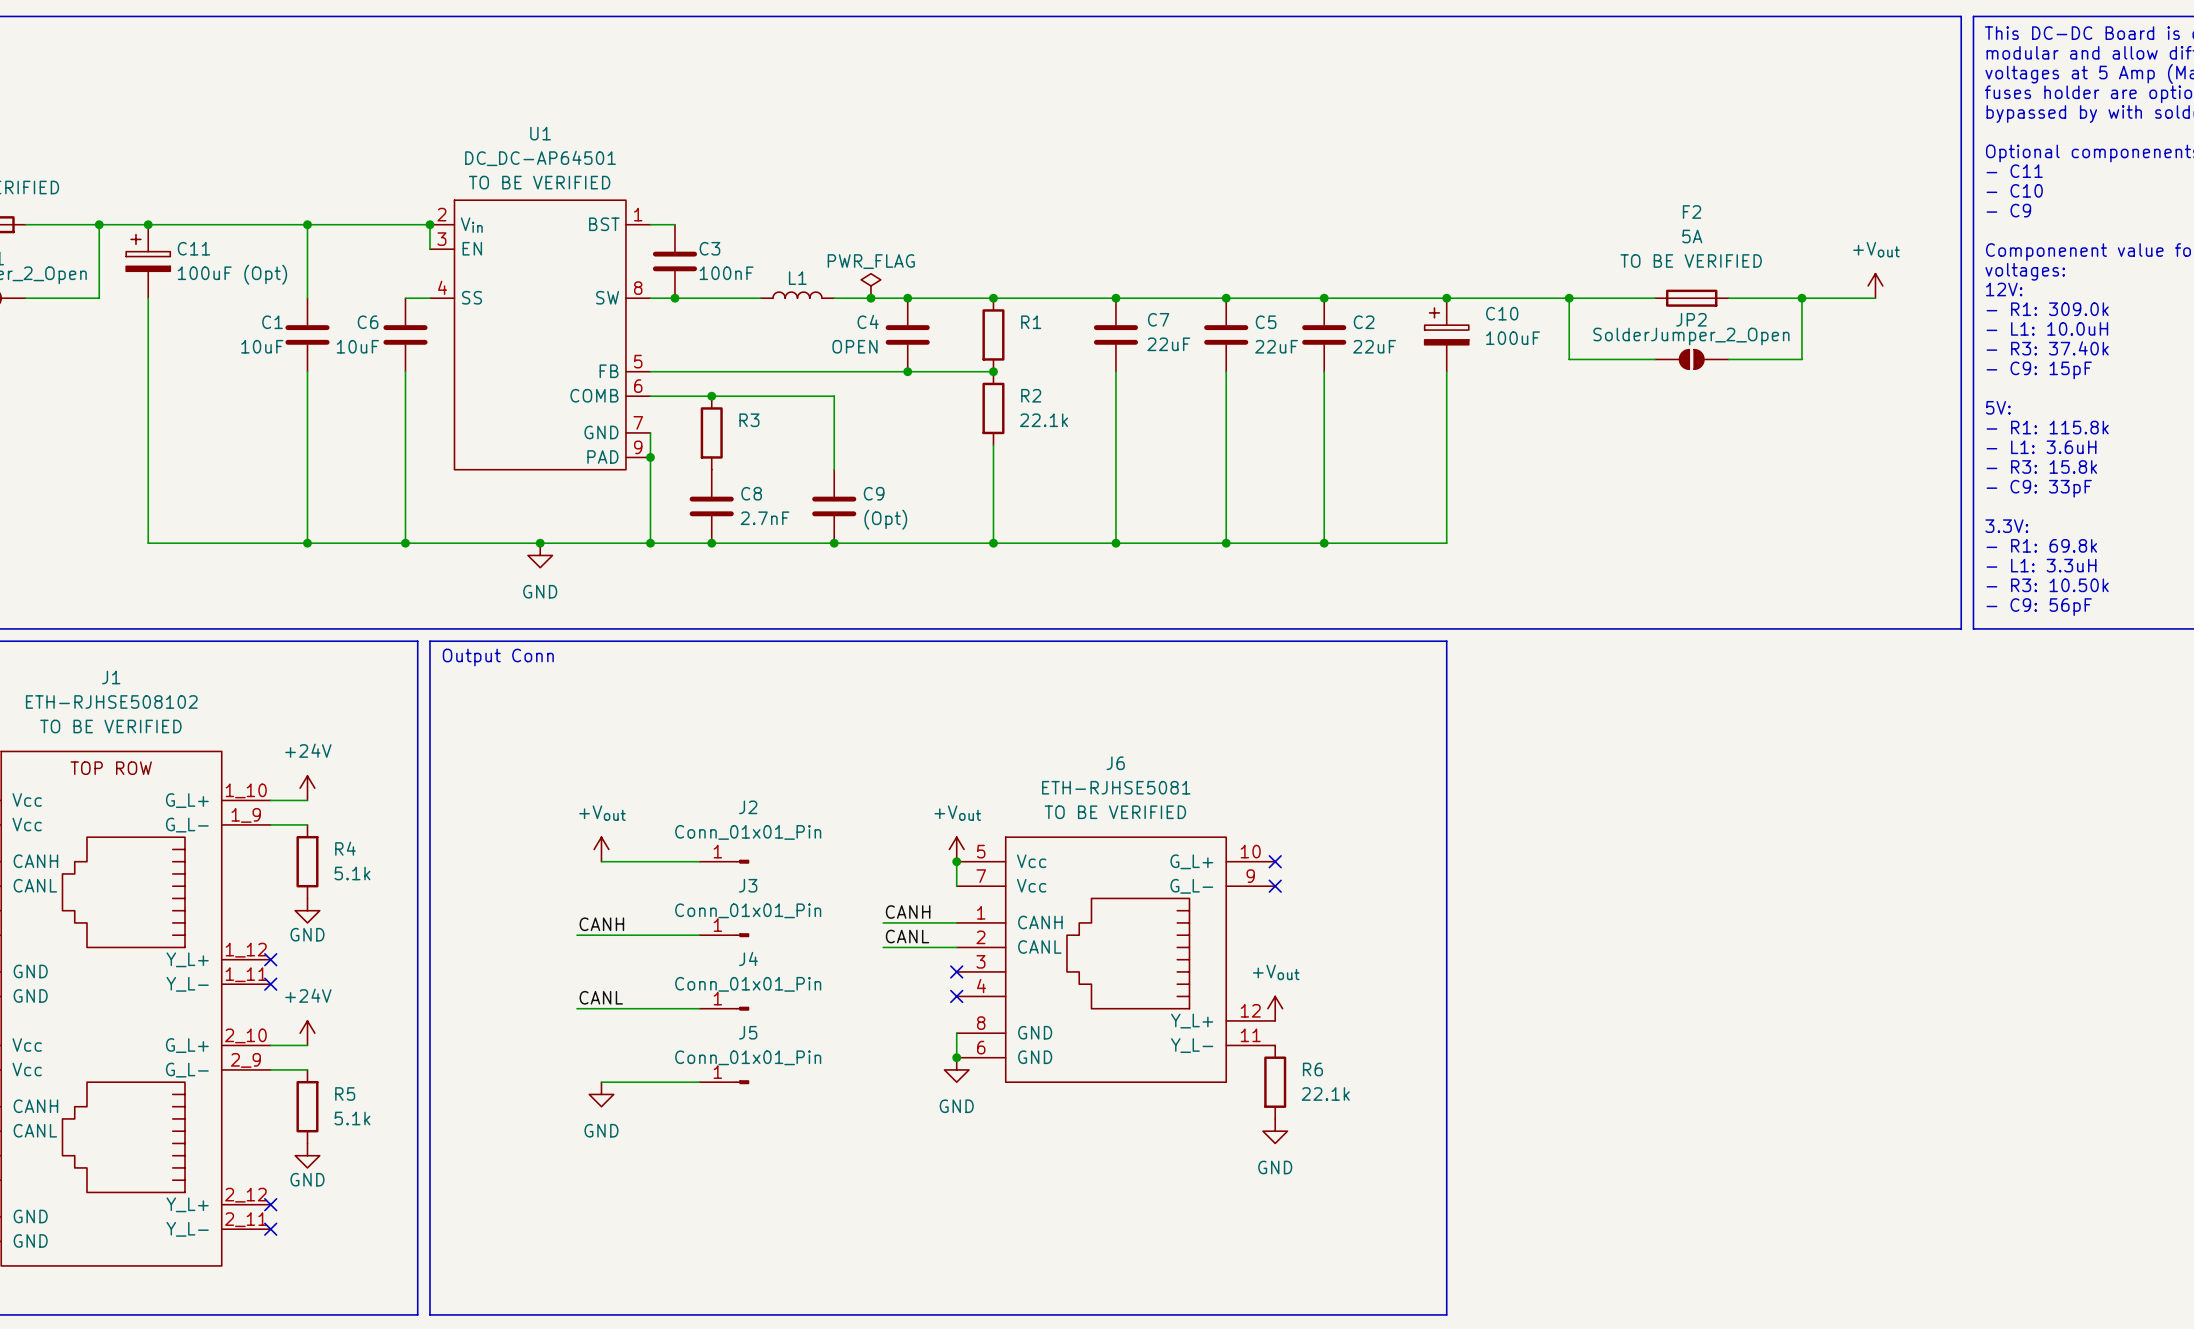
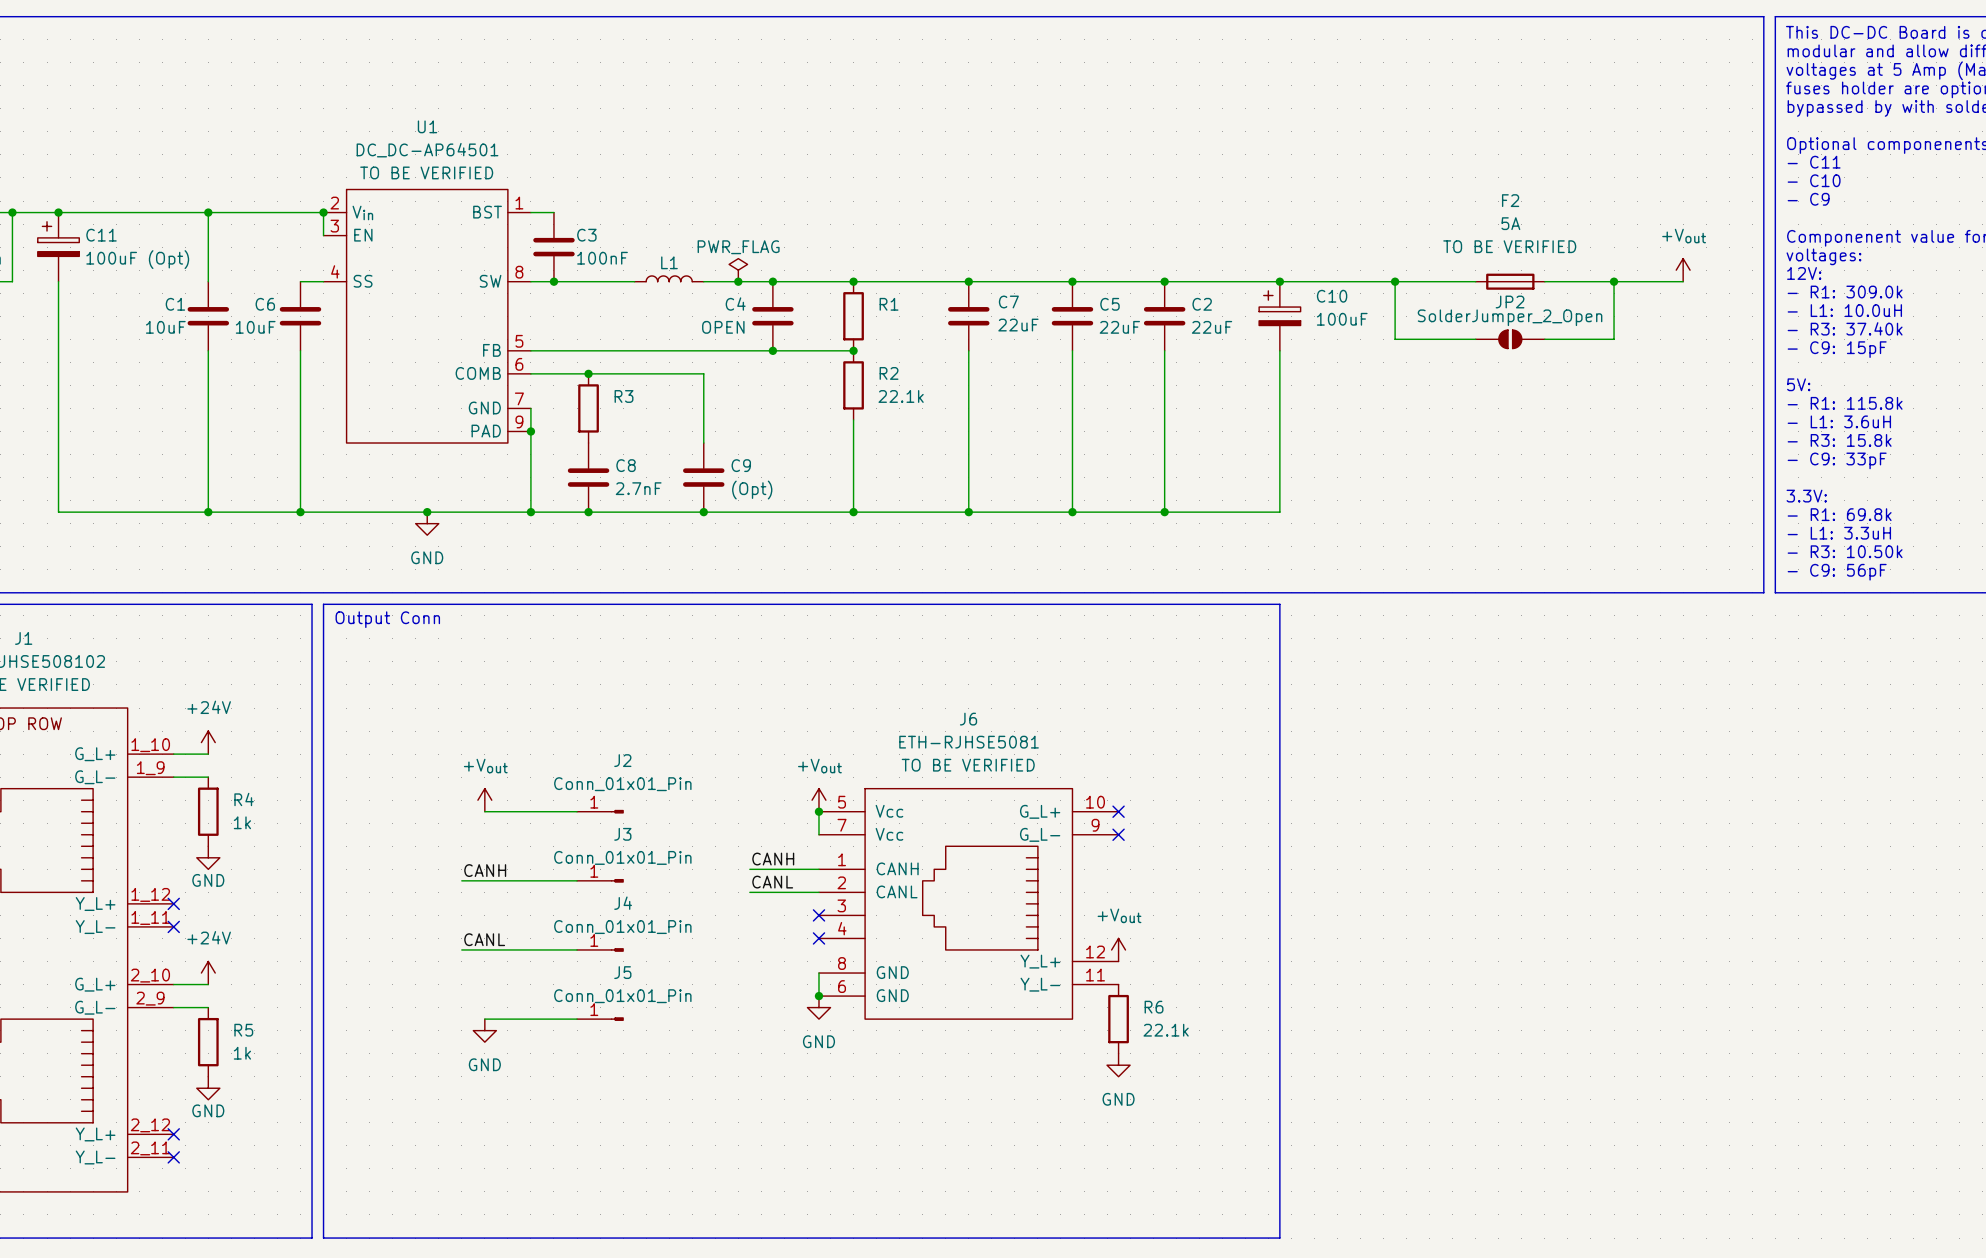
R4 value: 5.1k (352, 873) -> 1k (242, 822)
R5 value: 5.1k (352, 1118) -> 1k (242, 1053)

